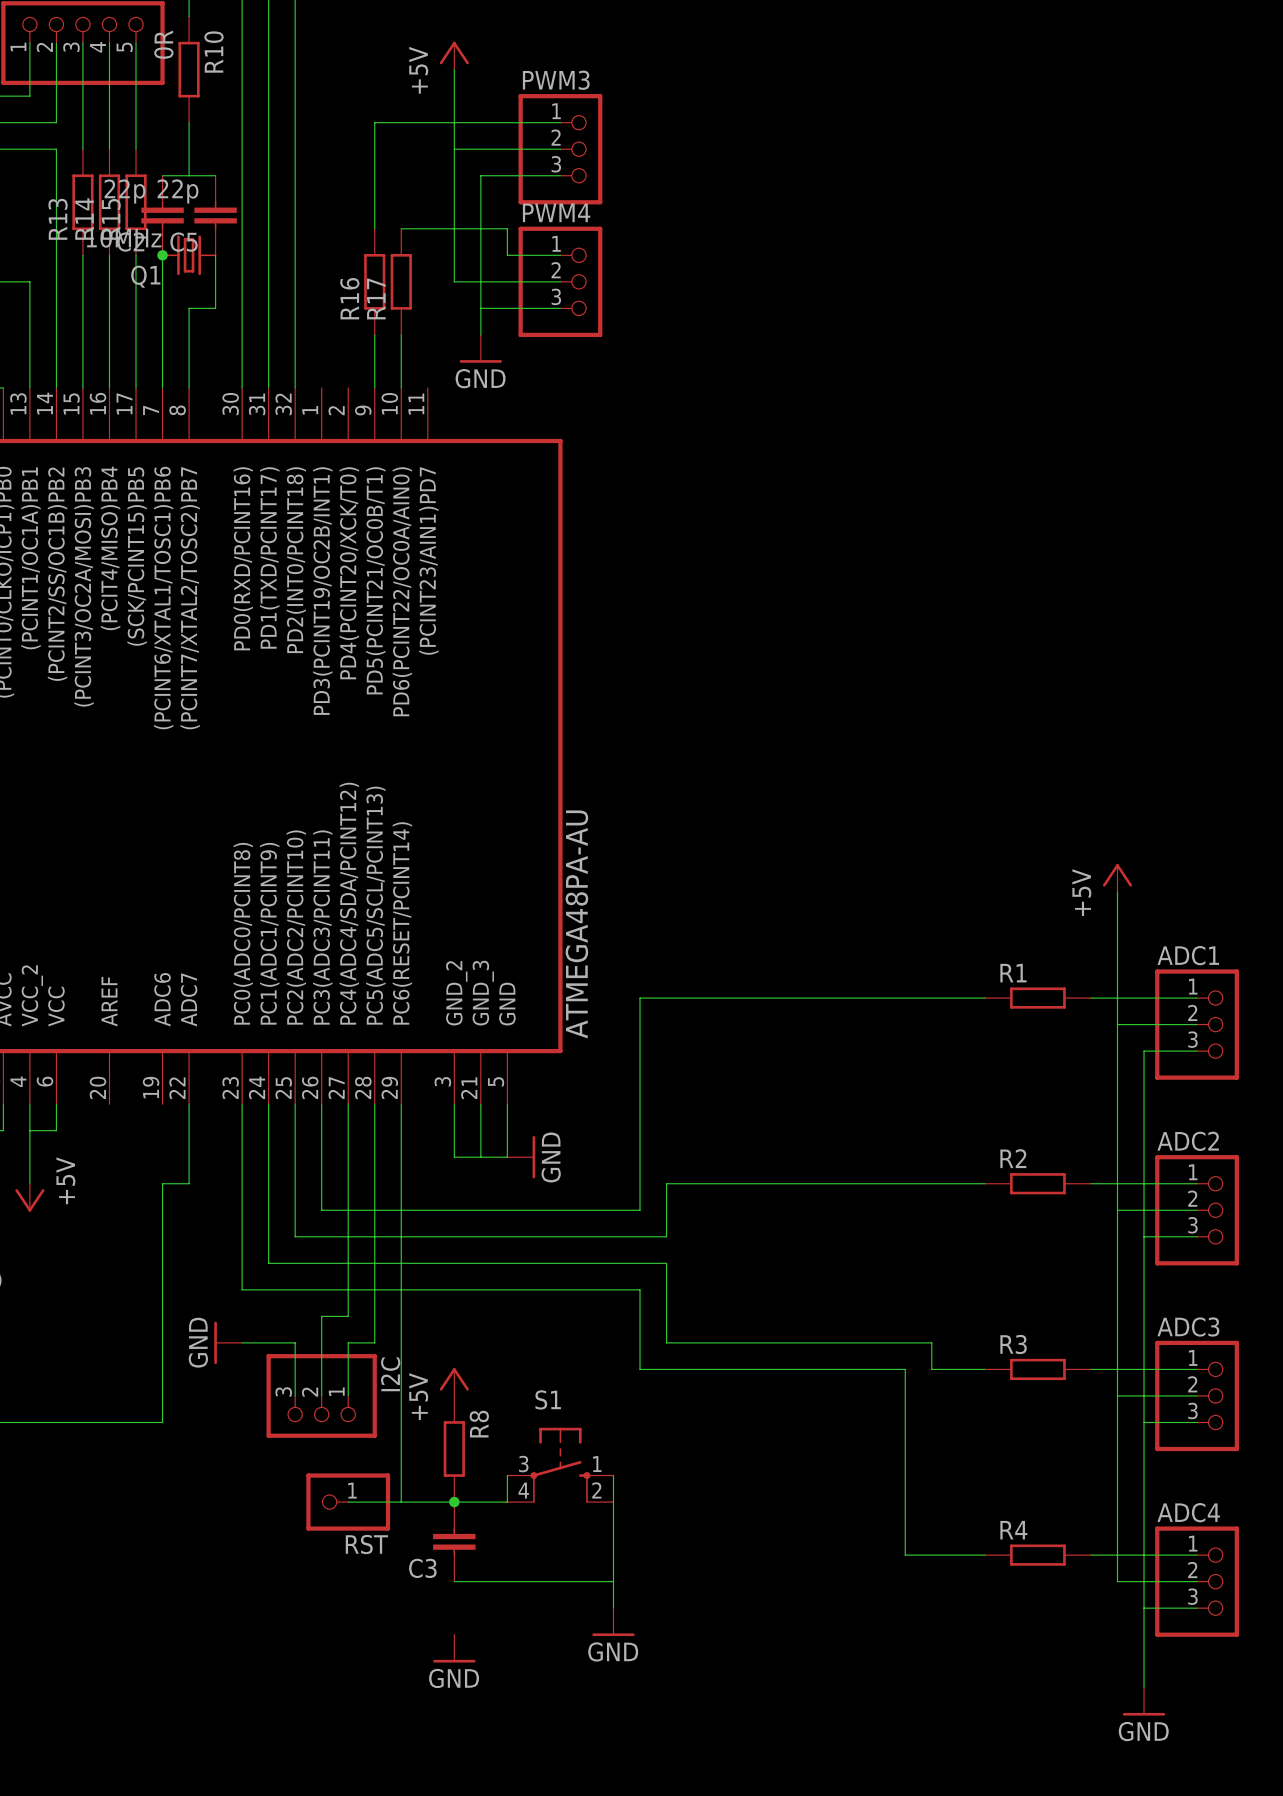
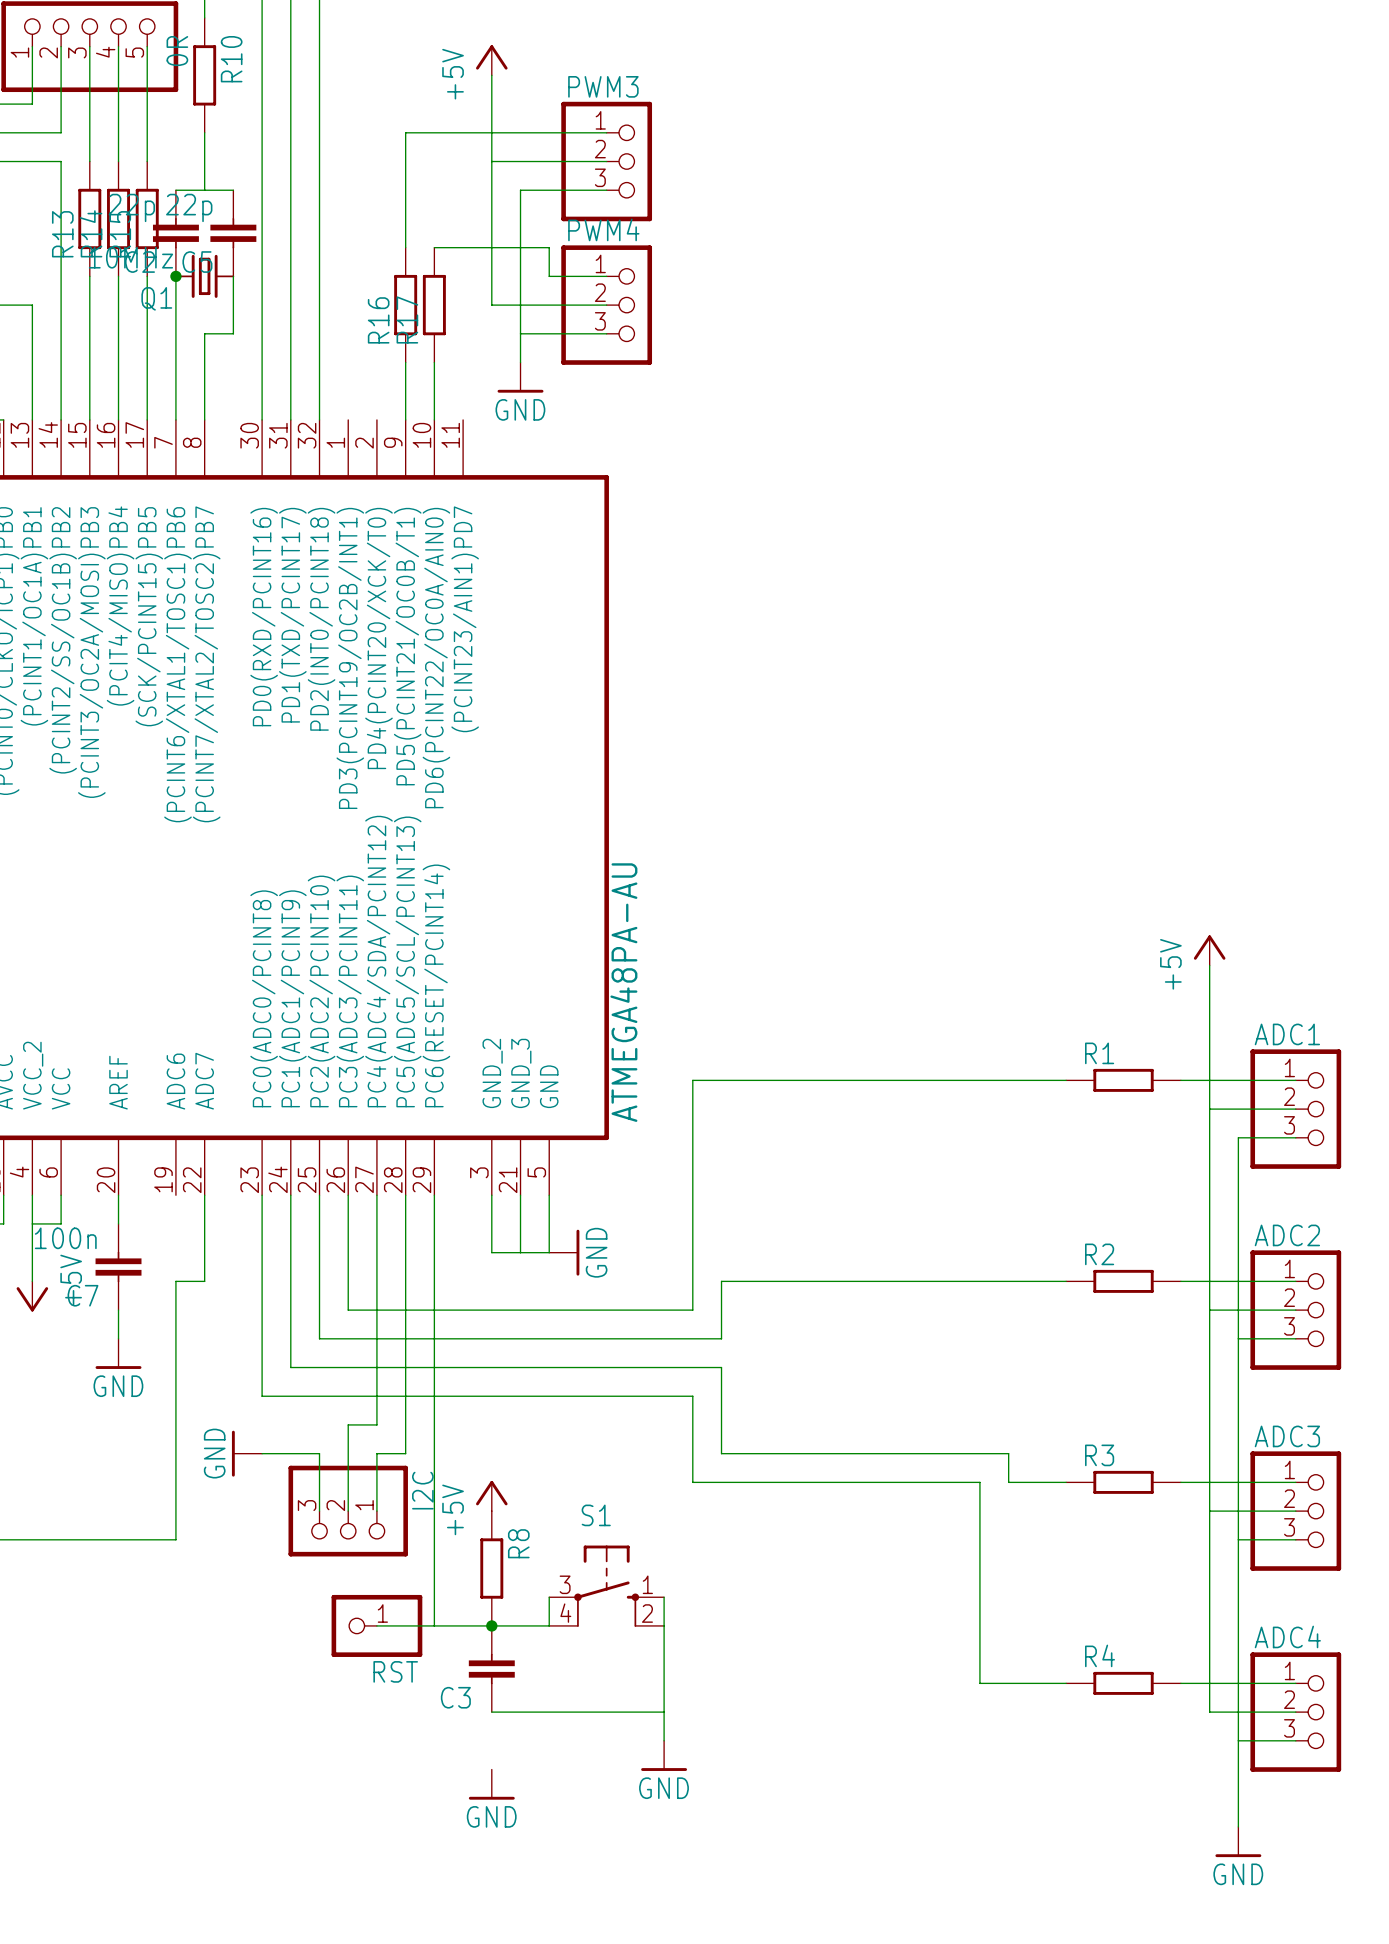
wire: none -> (118, 1195) (118, 1223)
C7: none -> 100n (118, 1267)
wire: none -> (118, 1310) (118, 1338)
power symbol: none -> GND (118, 1353)

